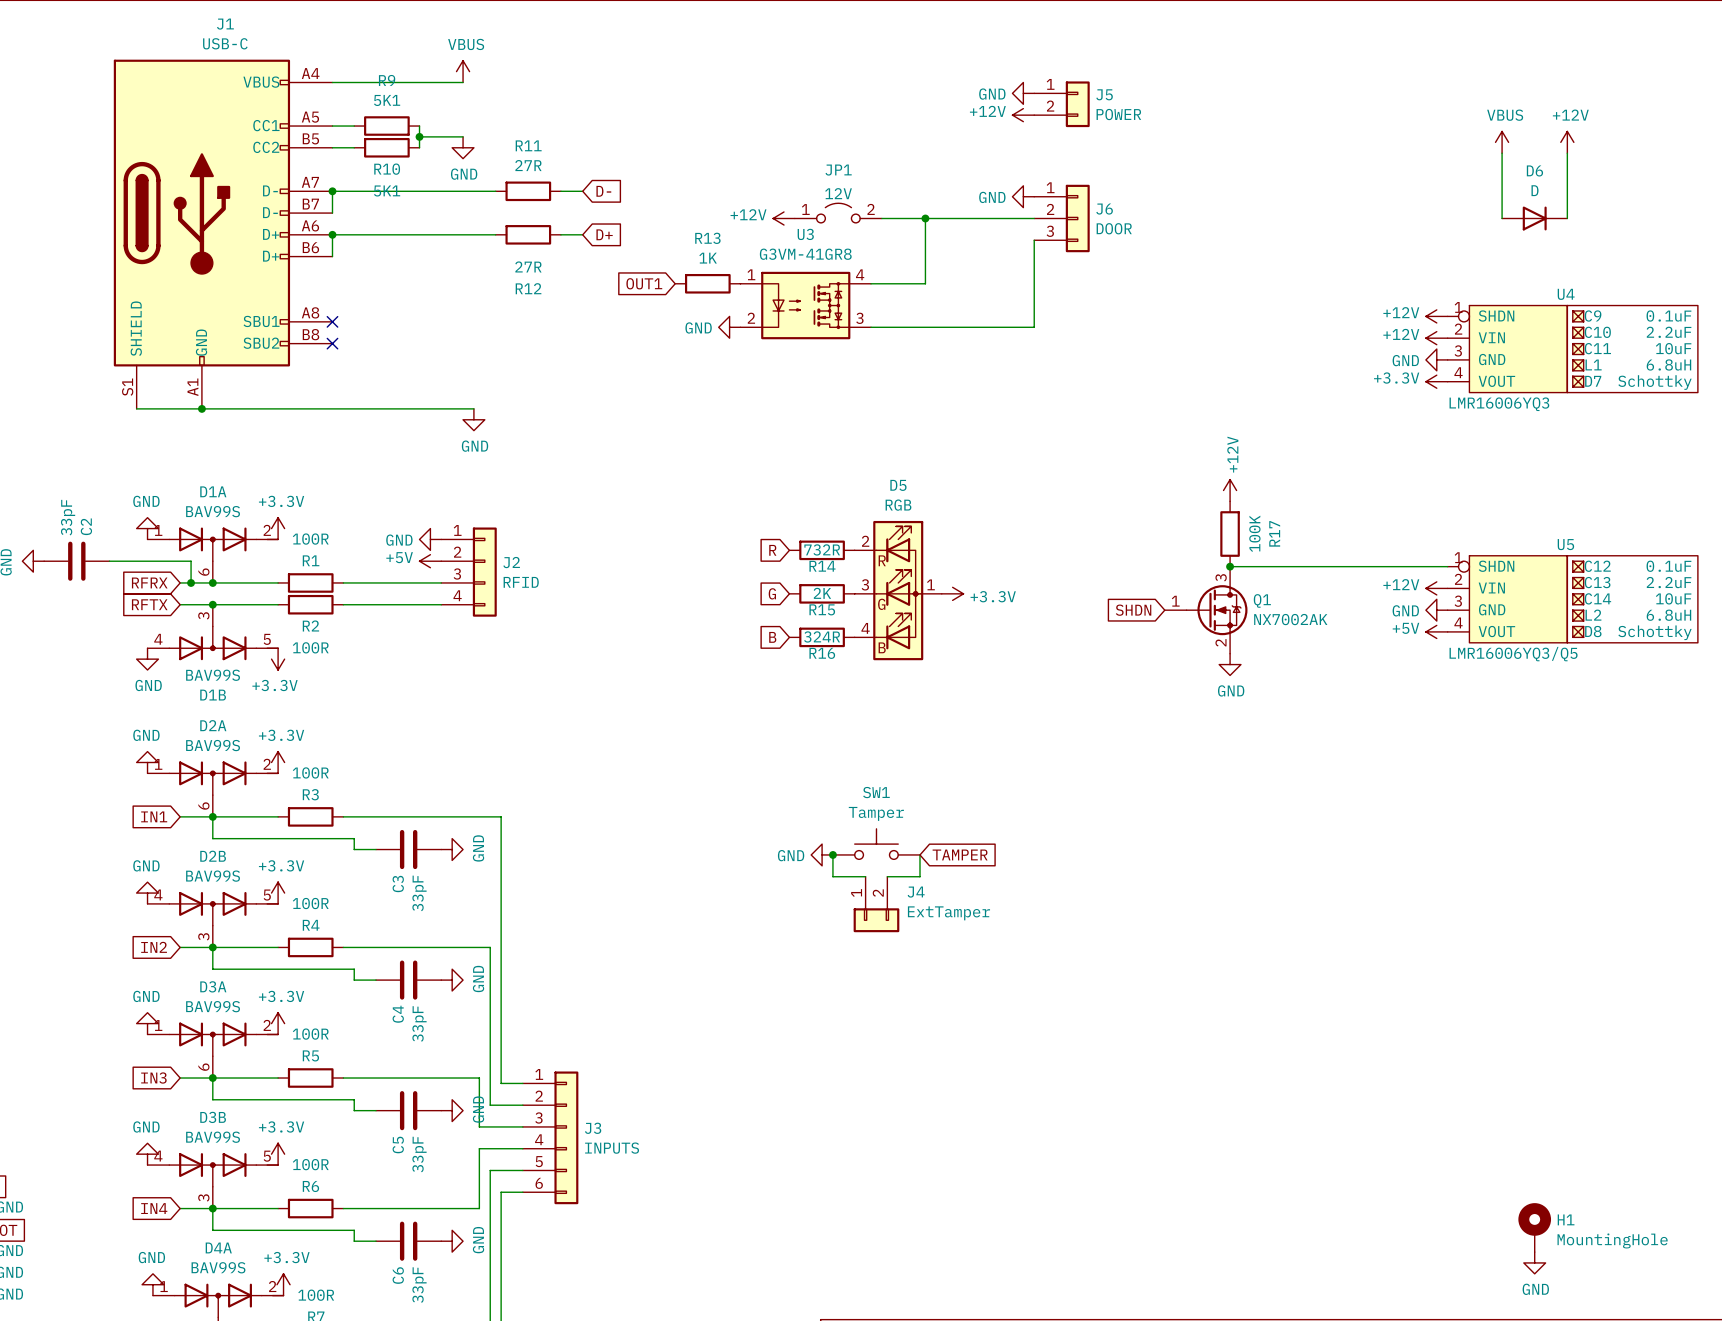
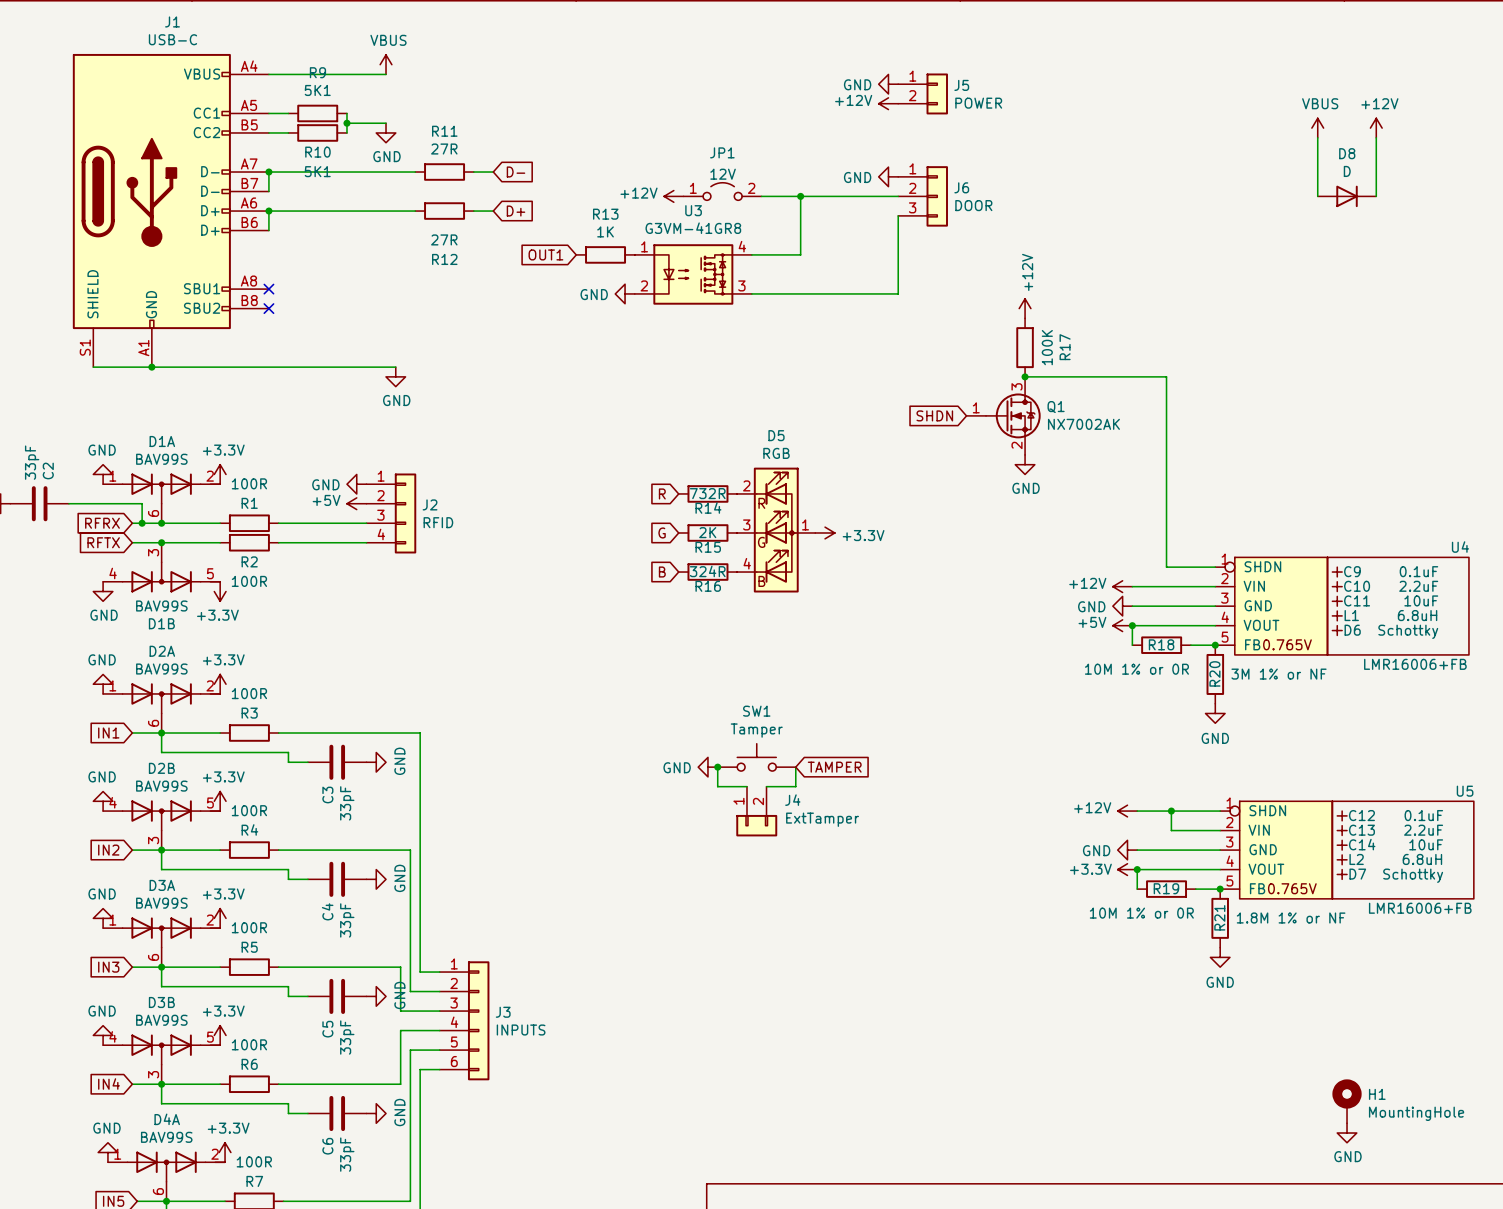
D6 name: D6 (1534, 170) -> D8 (1347, 153)
U4 name position: U4 (1566, 294) -> U4 (1460, 547)
U4 symbol: [1447, 305, 1698, 393] -> [1215, 557, 1469, 655]
C9 symbol: [1572, 310, 1585, 323] -> [1331, 566, 1343, 578]
power symbol: +12V (1436, 316) -> none
C10 symbol: [1572, 326, 1585, 339] -> [1331, 581, 1343, 593]
power symbol: +12V (1436, 338) -> none
C11 symbol: [1572, 342, 1585, 356] -> [1331, 595, 1343, 607]
power symbol: none -> +12V (1025, 308)
power symbol: GND (1436, 359) -> none
L1 symbol: [1572, 359, 1585, 372] -> [1331, 610, 1343, 622]
D7 symbol: [1572, 375, 1585, 388] -> [1336, 869, 1348, 880]
power symbol: +3.3V (1436, 381) -> none
U4 value: LMR16006YQ3 (1499, 404) -> LMR16006+FB (1415, 664)
wire: none -> (1025, 376) (1166, 376) (1166, 567) (1215, 567)
junction: none -> (1025, 376)
power symbol: +12V (1230, 490) -> none
power symbol: none -> GND (1025, 464)
R17 position: (1230, 534) -> (1025, 347)
U5 name position: U5 (1565, 544) -> U5 (1465, 791)
U5 symbol: [1447, 555, 1698, 643] -> [1220, 801, 1474, 899]
C12 symbol: [1572, 560, 1585, 573] -> [1336, 810, 1348, 822]
wire: (1230, 566) (1447, 566) -> none
junction: (1230, 566) -> none
C13 symbol: [1572, 576, 1585, 590] -> [1336, 825, 1348, 837]
power symbol: +12V (1436, 588) -> none
C14 symbol: [1572, 593, 1585, 606] -> [1336, 839, 1348, 851]
L2 symbol: [1572, 609, 1585, 622] -> [1336, 854, 1348, 866]
global label position: SHDN (1133, 610) -> SHDN (934, 415)
Q1 position: (1206, 610) -> (1003, 415)
power symbol: GND (1436, 610) -> none
power symbol position: +5V (1436, 631) -> +5V (1122, 625)
D8: Schottky (1578, 631) -> none
power symbol: none -> +12V (1122, 586)
wire: none -> (1132, 586) (1215, 586)
U5 value: LMR16006YQ3/Q5 (1513, 654) -> LMR16006+FB (1420, 908)
power symbol rotation: 0° (1230, 664) -> 90° clockwise (1122, 606)
power symbol position: GND (1230, 664) -> GND (1122, 606)
wire: none -> (1132, 606) (1215, 606)
junction: none -> (1132, 625)
wire: none -> (1215, 625) (1132, 625) (1132, 645)
D6: none -> Schottky (1337, 630)
R18: none -> 10M 1% or 0R (1161, 645)
wire: none -> (1190, 645) (1215, 645)
junction: none -> (1215, 645)
R20: none -> 3M 1% or NF (1215, 674)
power symbol: none -> GND (1215, 713)
power symbol: none -> +12V (1127, 811)
wire: none -> (1137, 811) (1220, 811)
wire: none -> (1171, 811) (1171, 830) (1220, 830)
junction: none -> (1171, 811)
power symbol: none -> GND (1127, 850)
wire: none -> (1137, 850) (1220, 850)
power symbol: none -> +3.3V (1127, 869)
junction: none -> (1137, 869)
wire: none -> (1220, 869) (1137, 869) (1137, 889)
R19: none -> 10M 1% or 0R (1166, 889)
wire: none -> (1195, 889) (1220, 889)
junction: none -> (1220, 889)
R21: none -> 1.8M 1% or NF (1220, 918)
power symbol: none -> GND (1220, 957)

